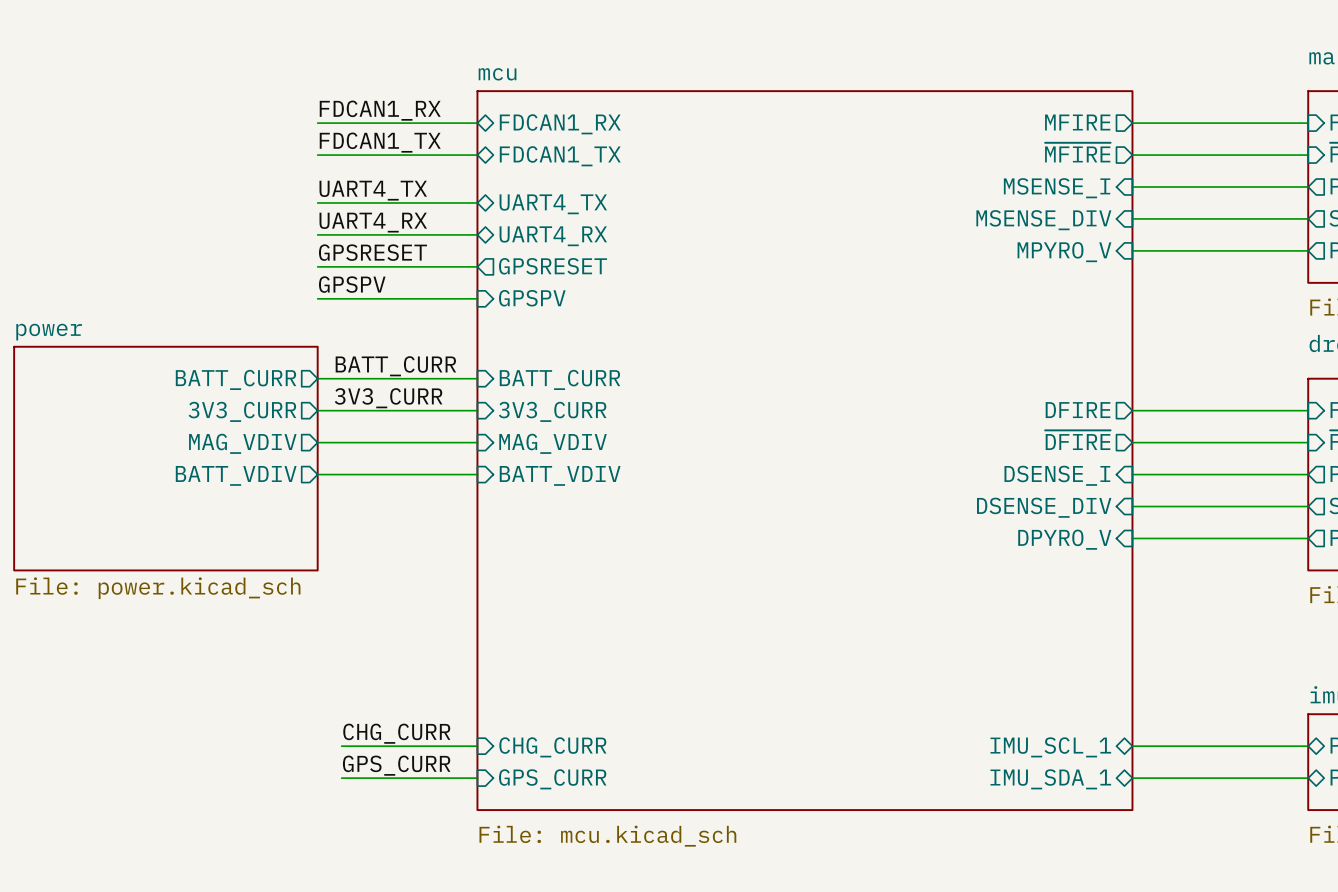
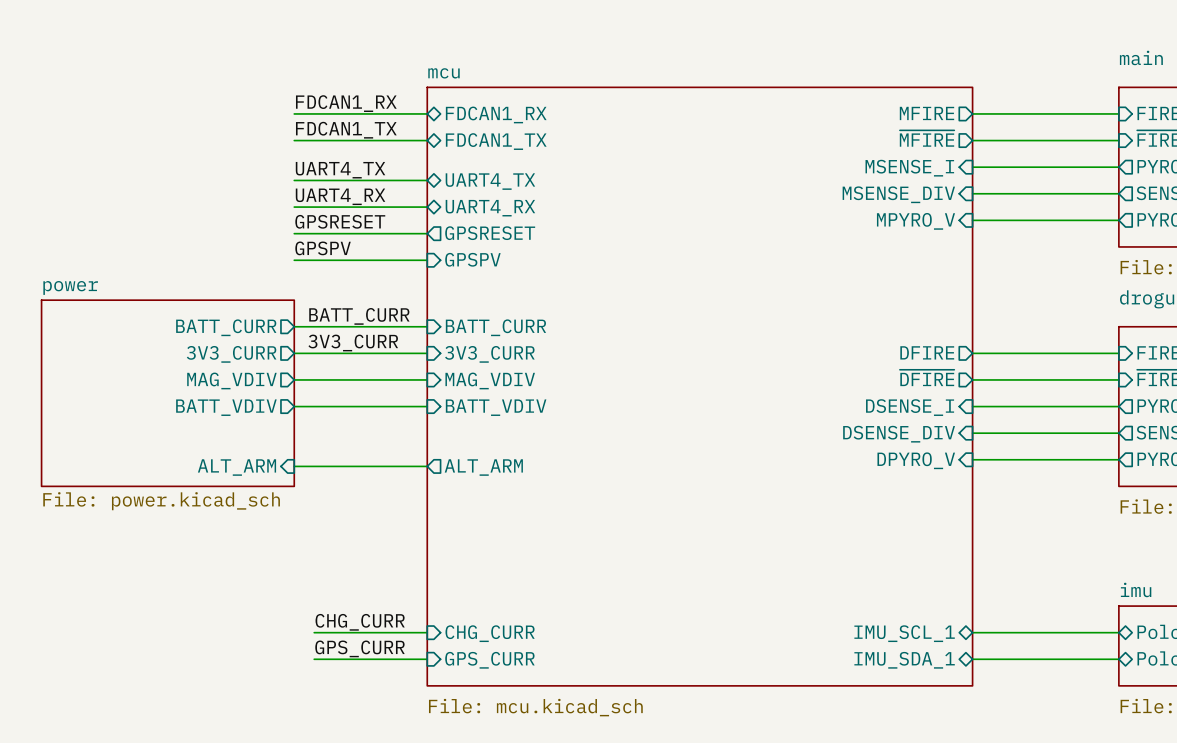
wire: none -> (294, 466) (427, 466)
sheet pin: none -> ALT_ARM (237, 467)
sheet pin: none -> ALT_ARM (483, 467)

